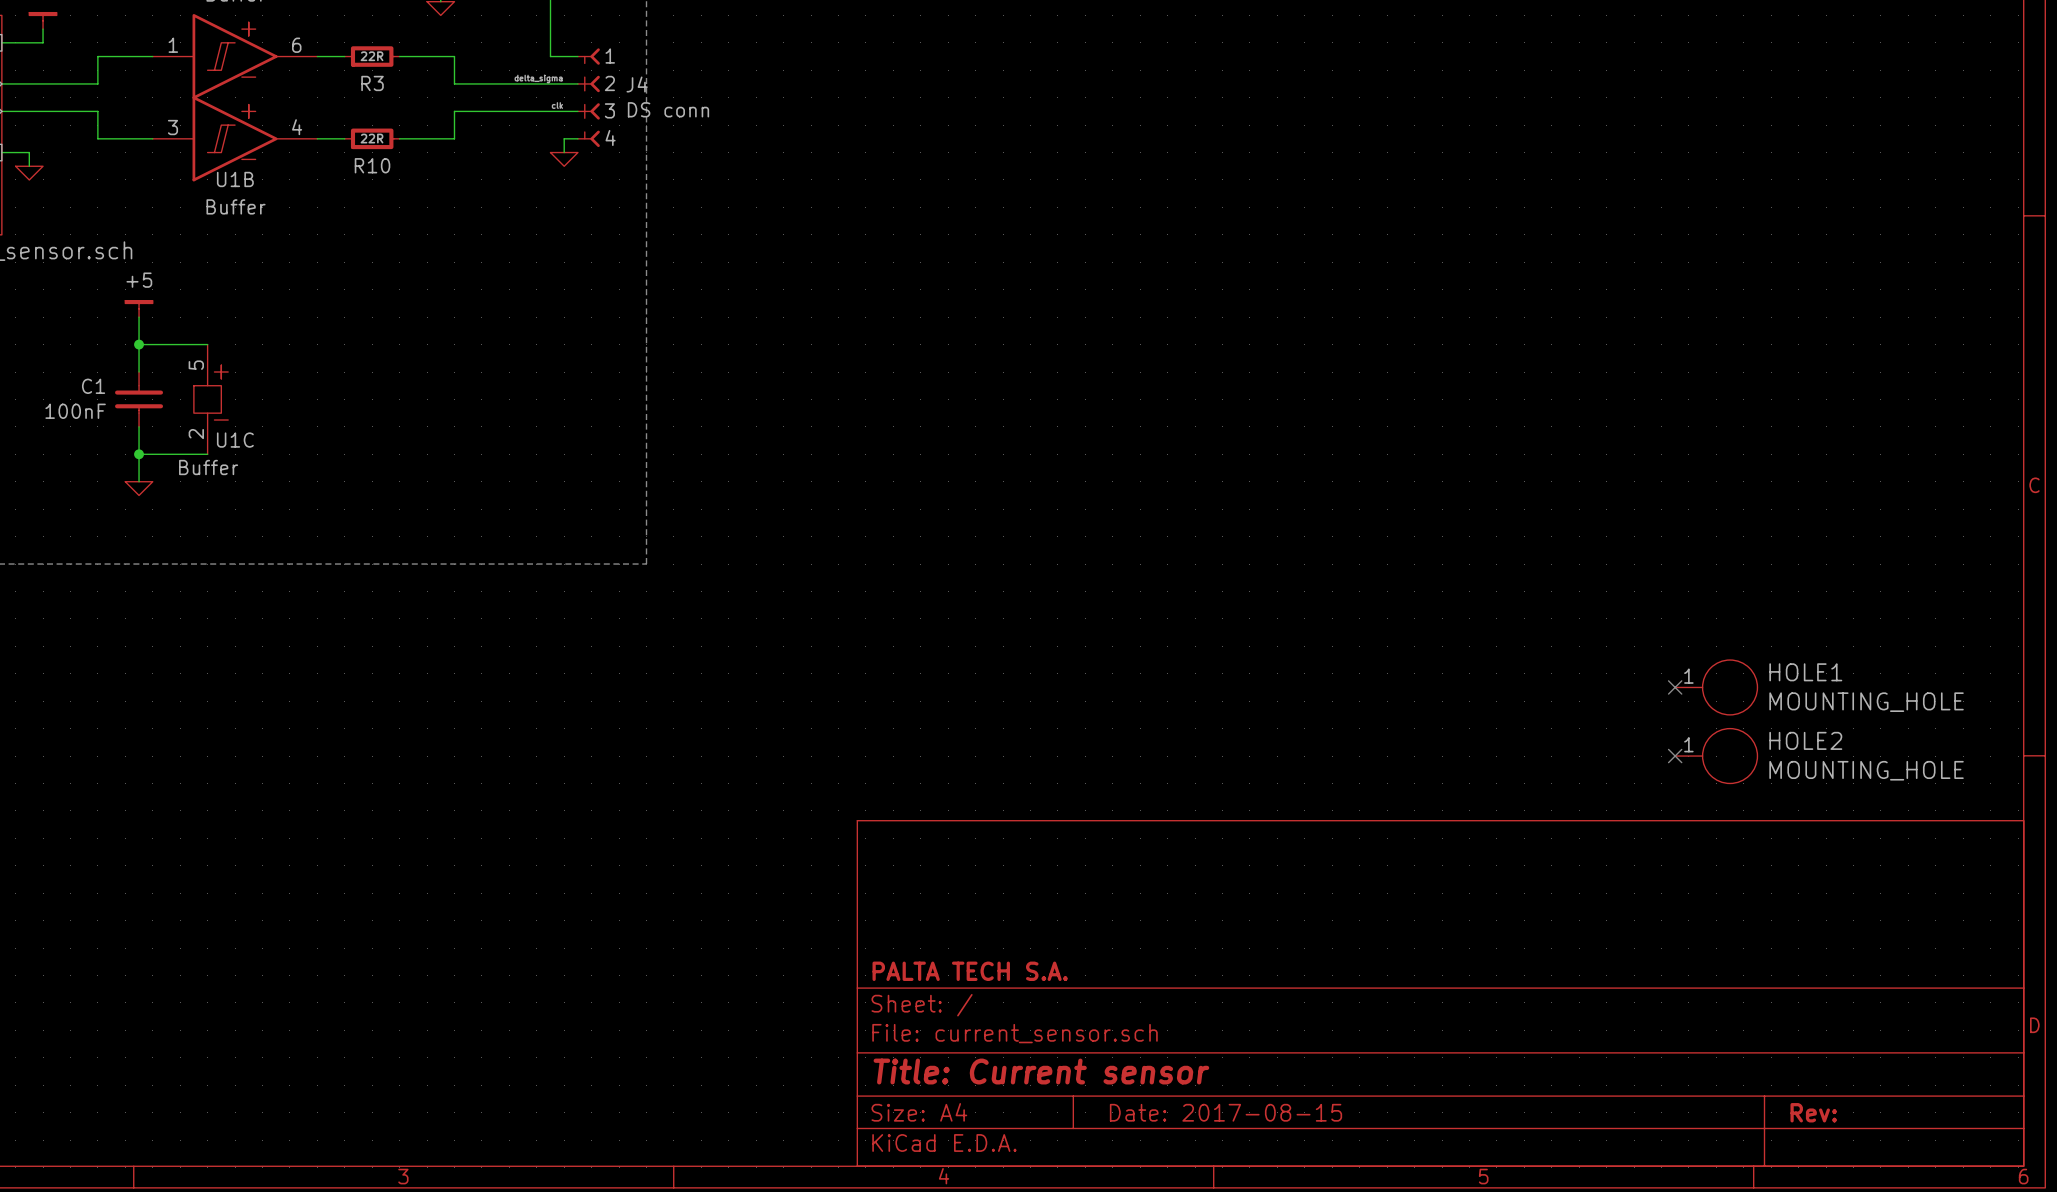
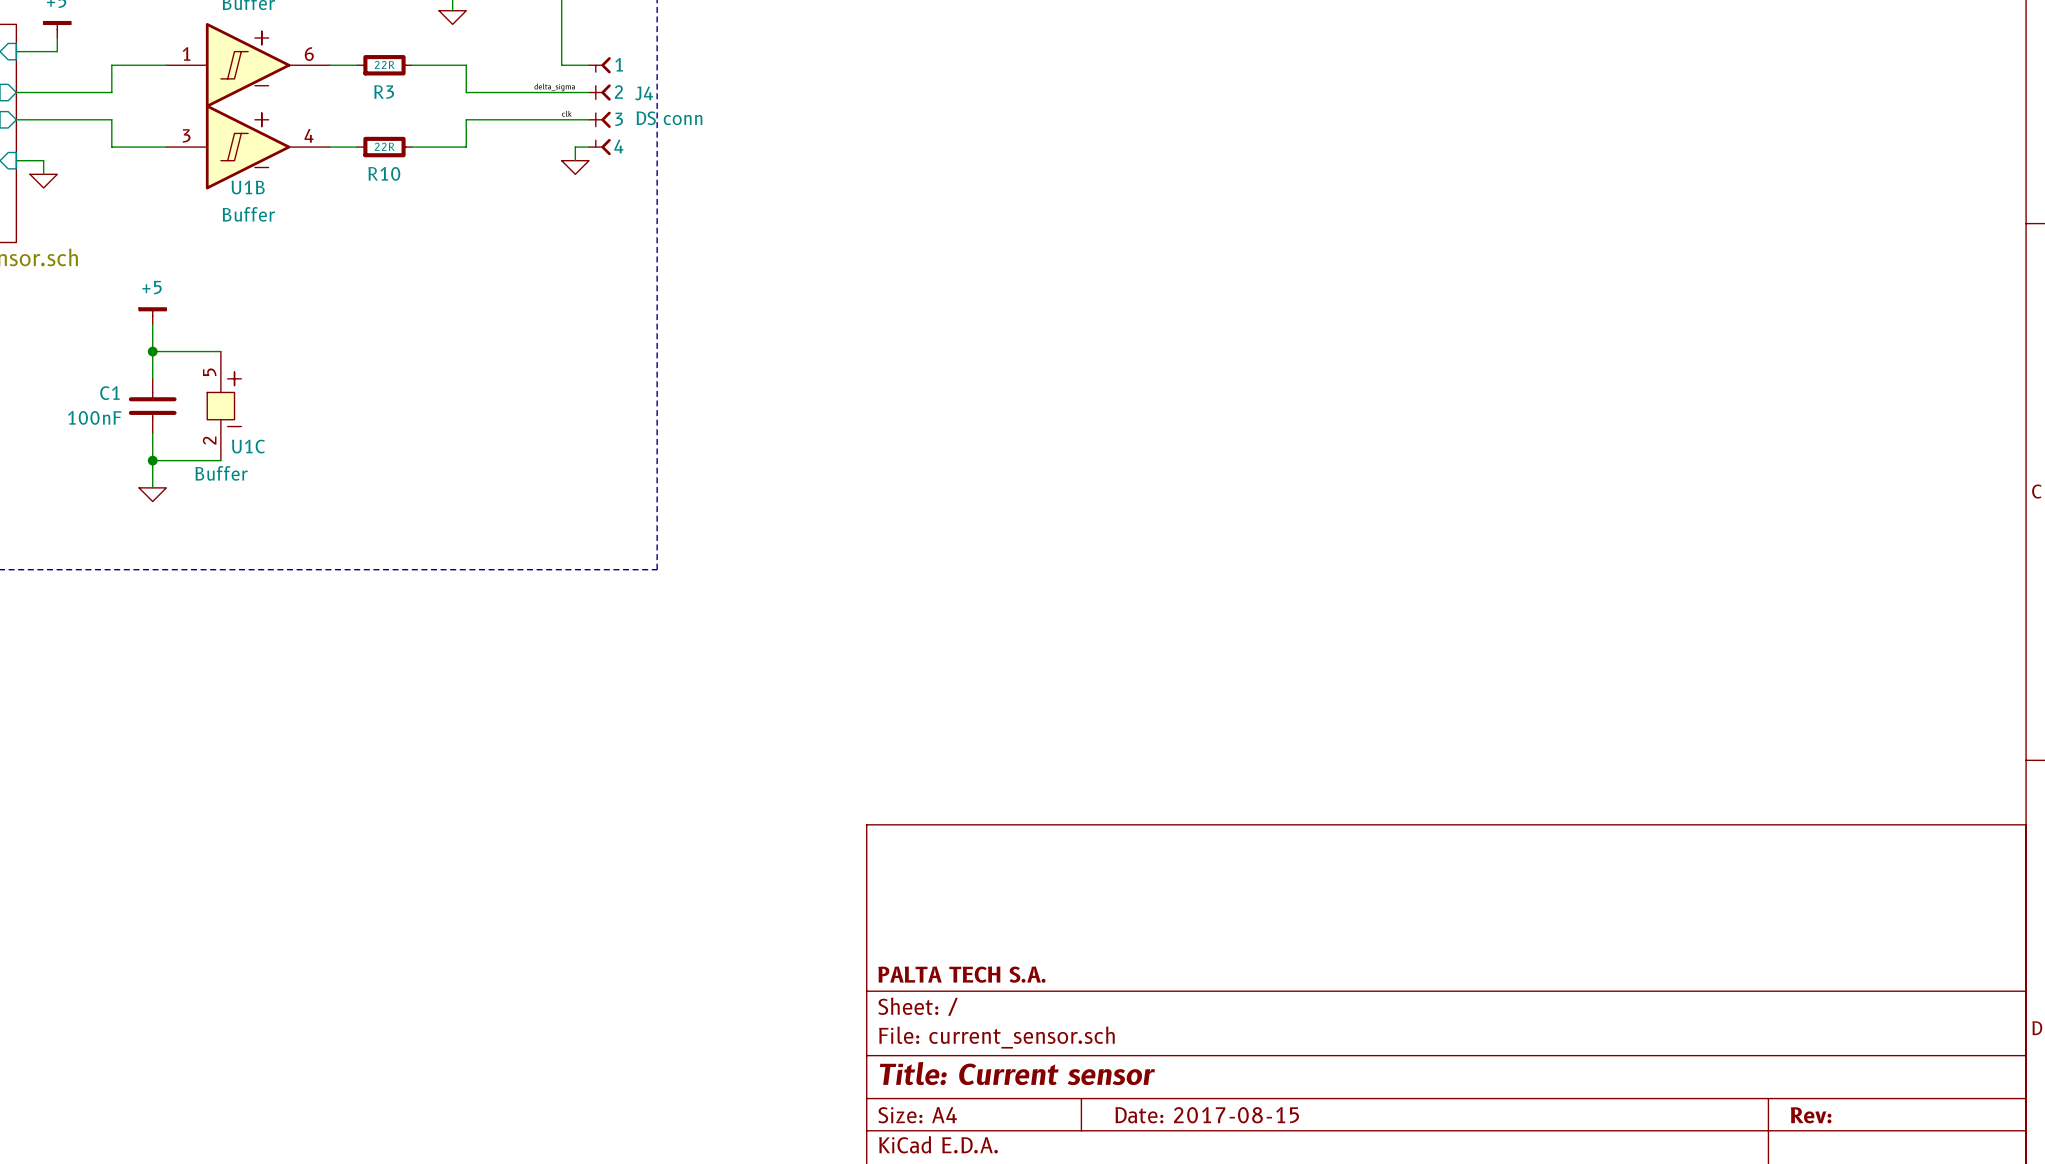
no-connect mark: (1675, 687) -> none
HOLE1: MOUNTING_HOLE (1716, 687) -> none
no-connect mark: (1675, 756) -> none
HOLE2: MOUNTING_HOLE (1716, 756) -> none

